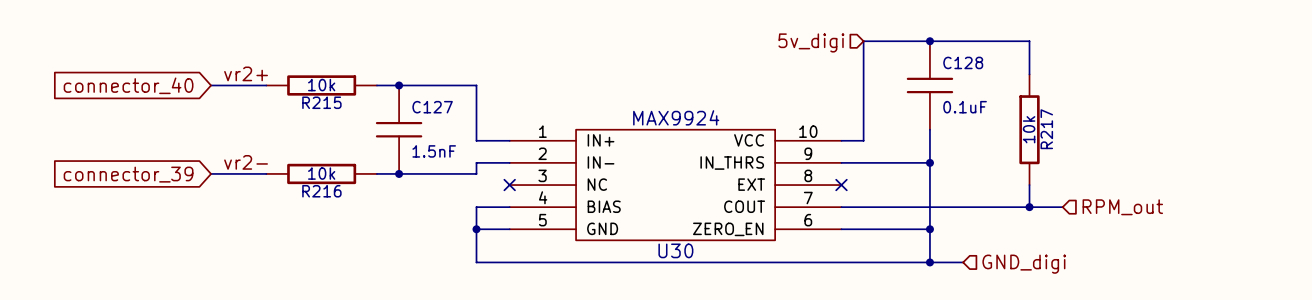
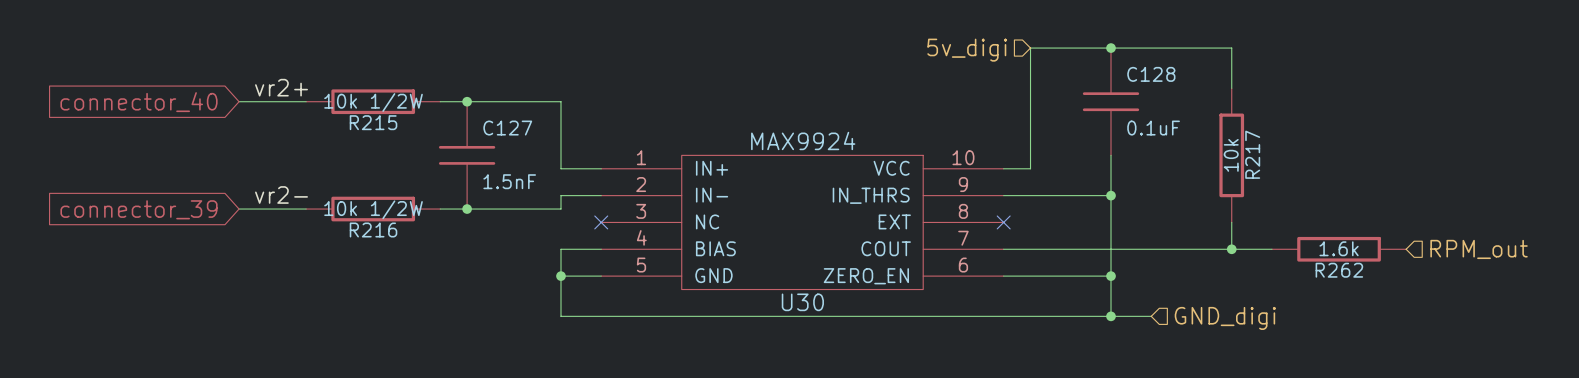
R215 value: 10k (321, 85) -> 10k 1/2W (373, 102)
R216 value: 10k (321, 173) -> 10k 1/2W (373, 209)
R262: none -> 1.6k (1339, 249)
hierarchical label position: RPM_out (1122, 207) -> RPM_out (1479, 249)

